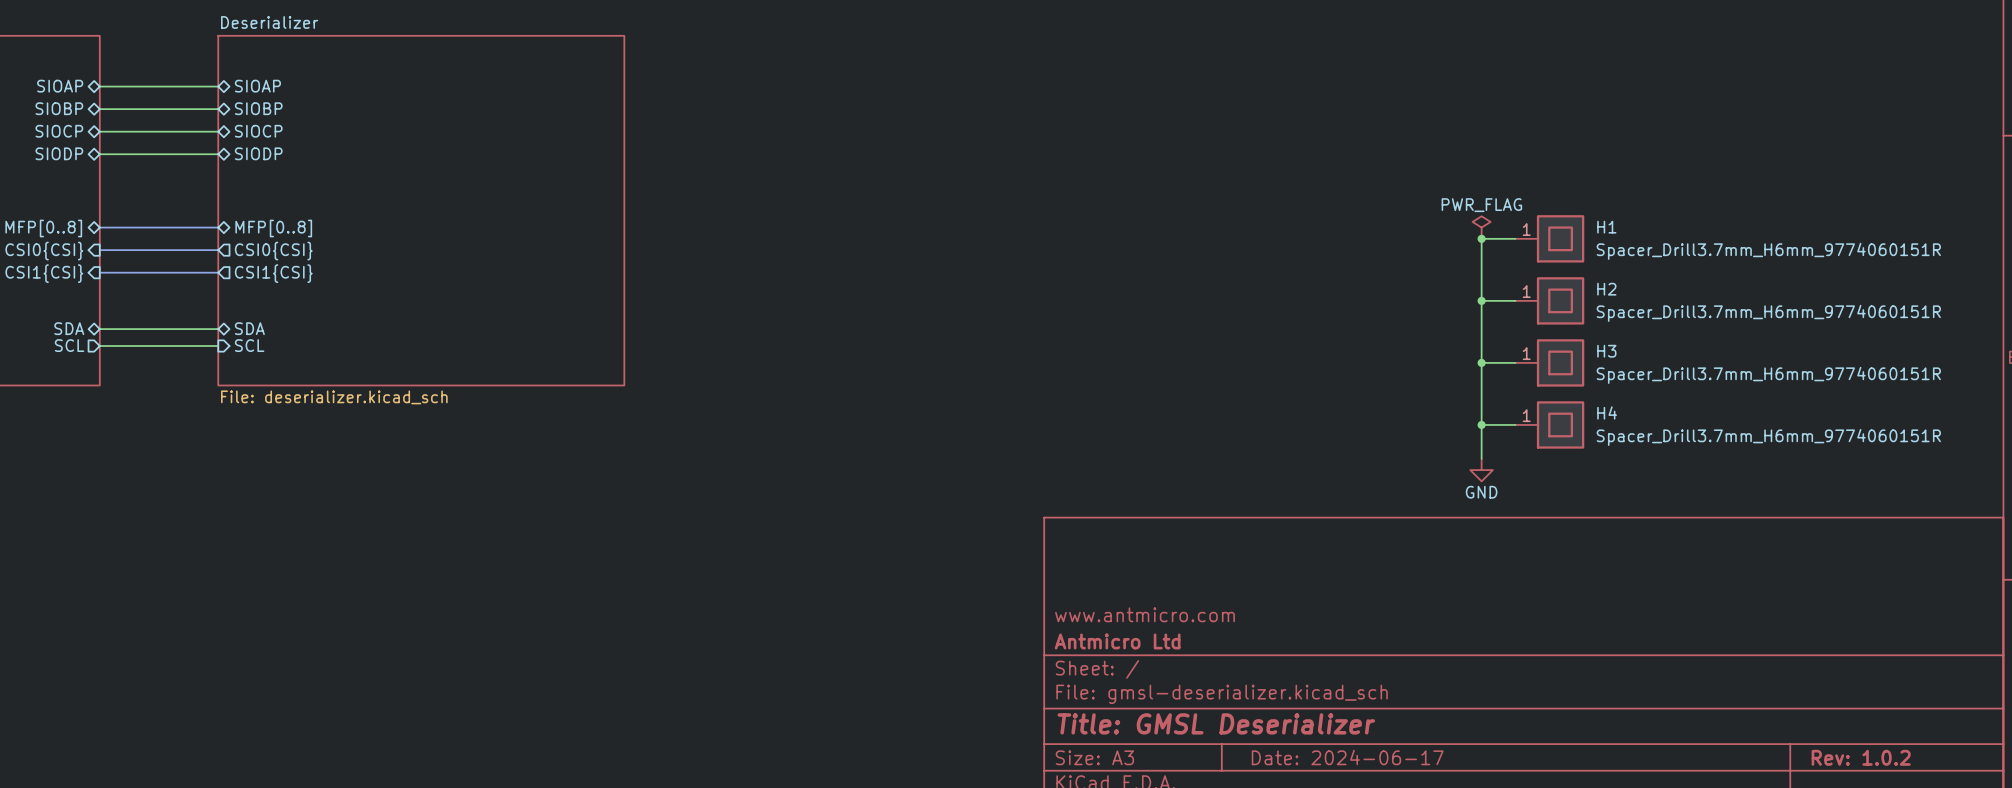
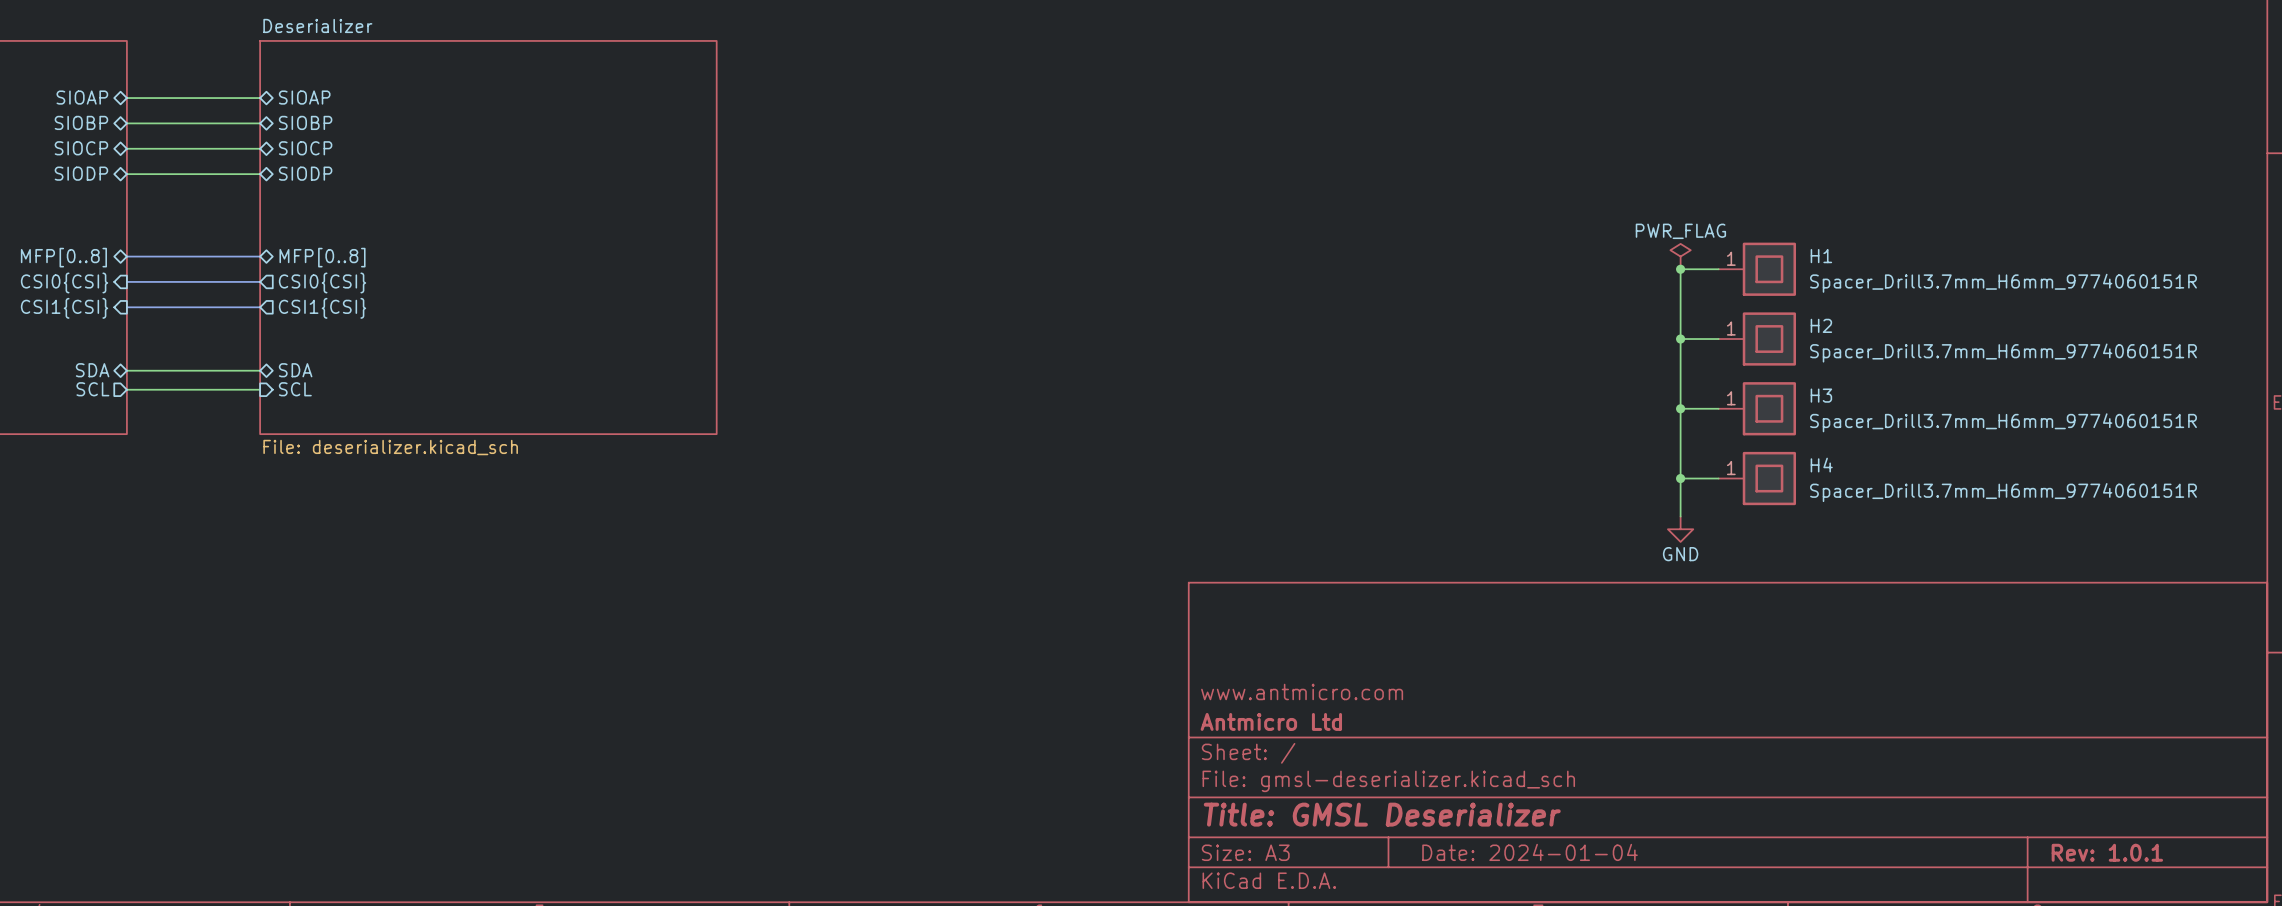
title block: Date: 2024-06-17 (1347, 757) -> Date: 2024-01-04 (1530, 852)
title block: Rev: 1.0.2 (1861, 757) -> Rev: 1.0.1 (2107, 852)

